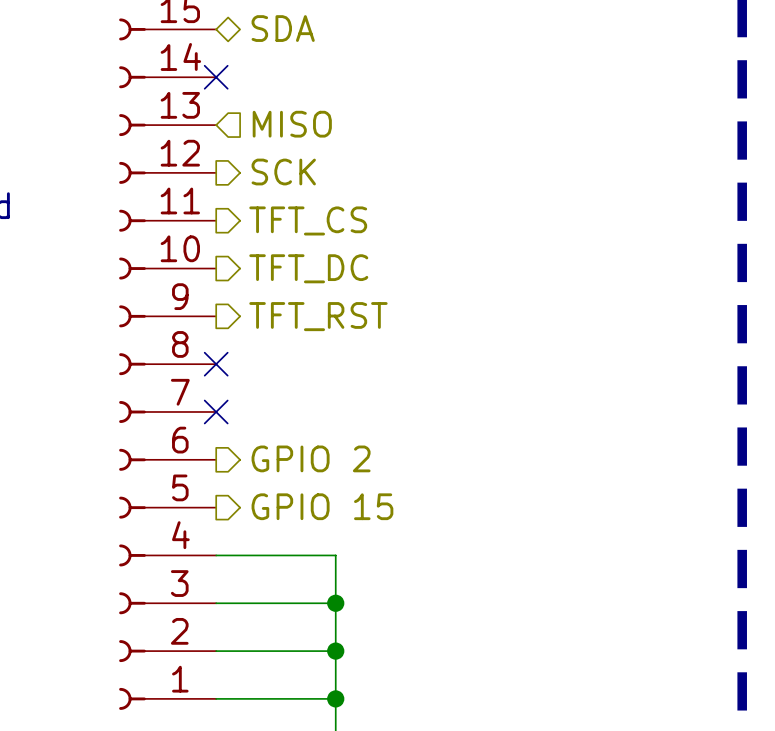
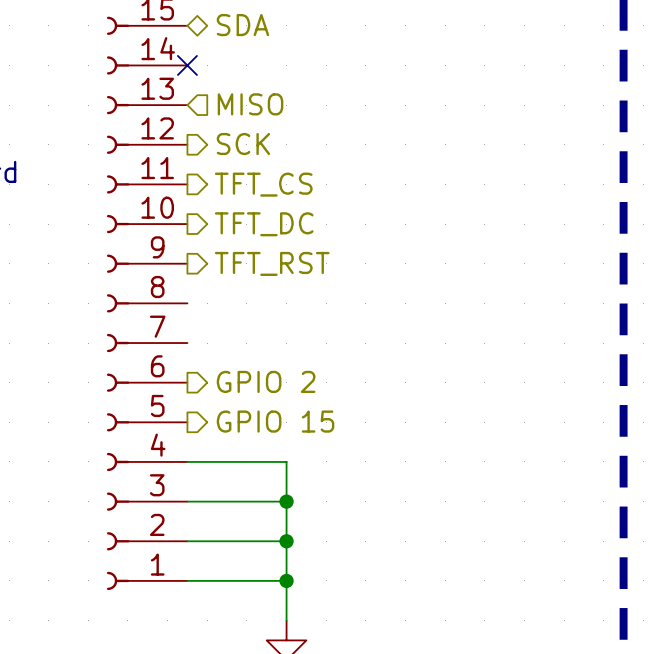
no-connect mark: (216, 364) -> none
no-connect mark: (216, 411) -> none

